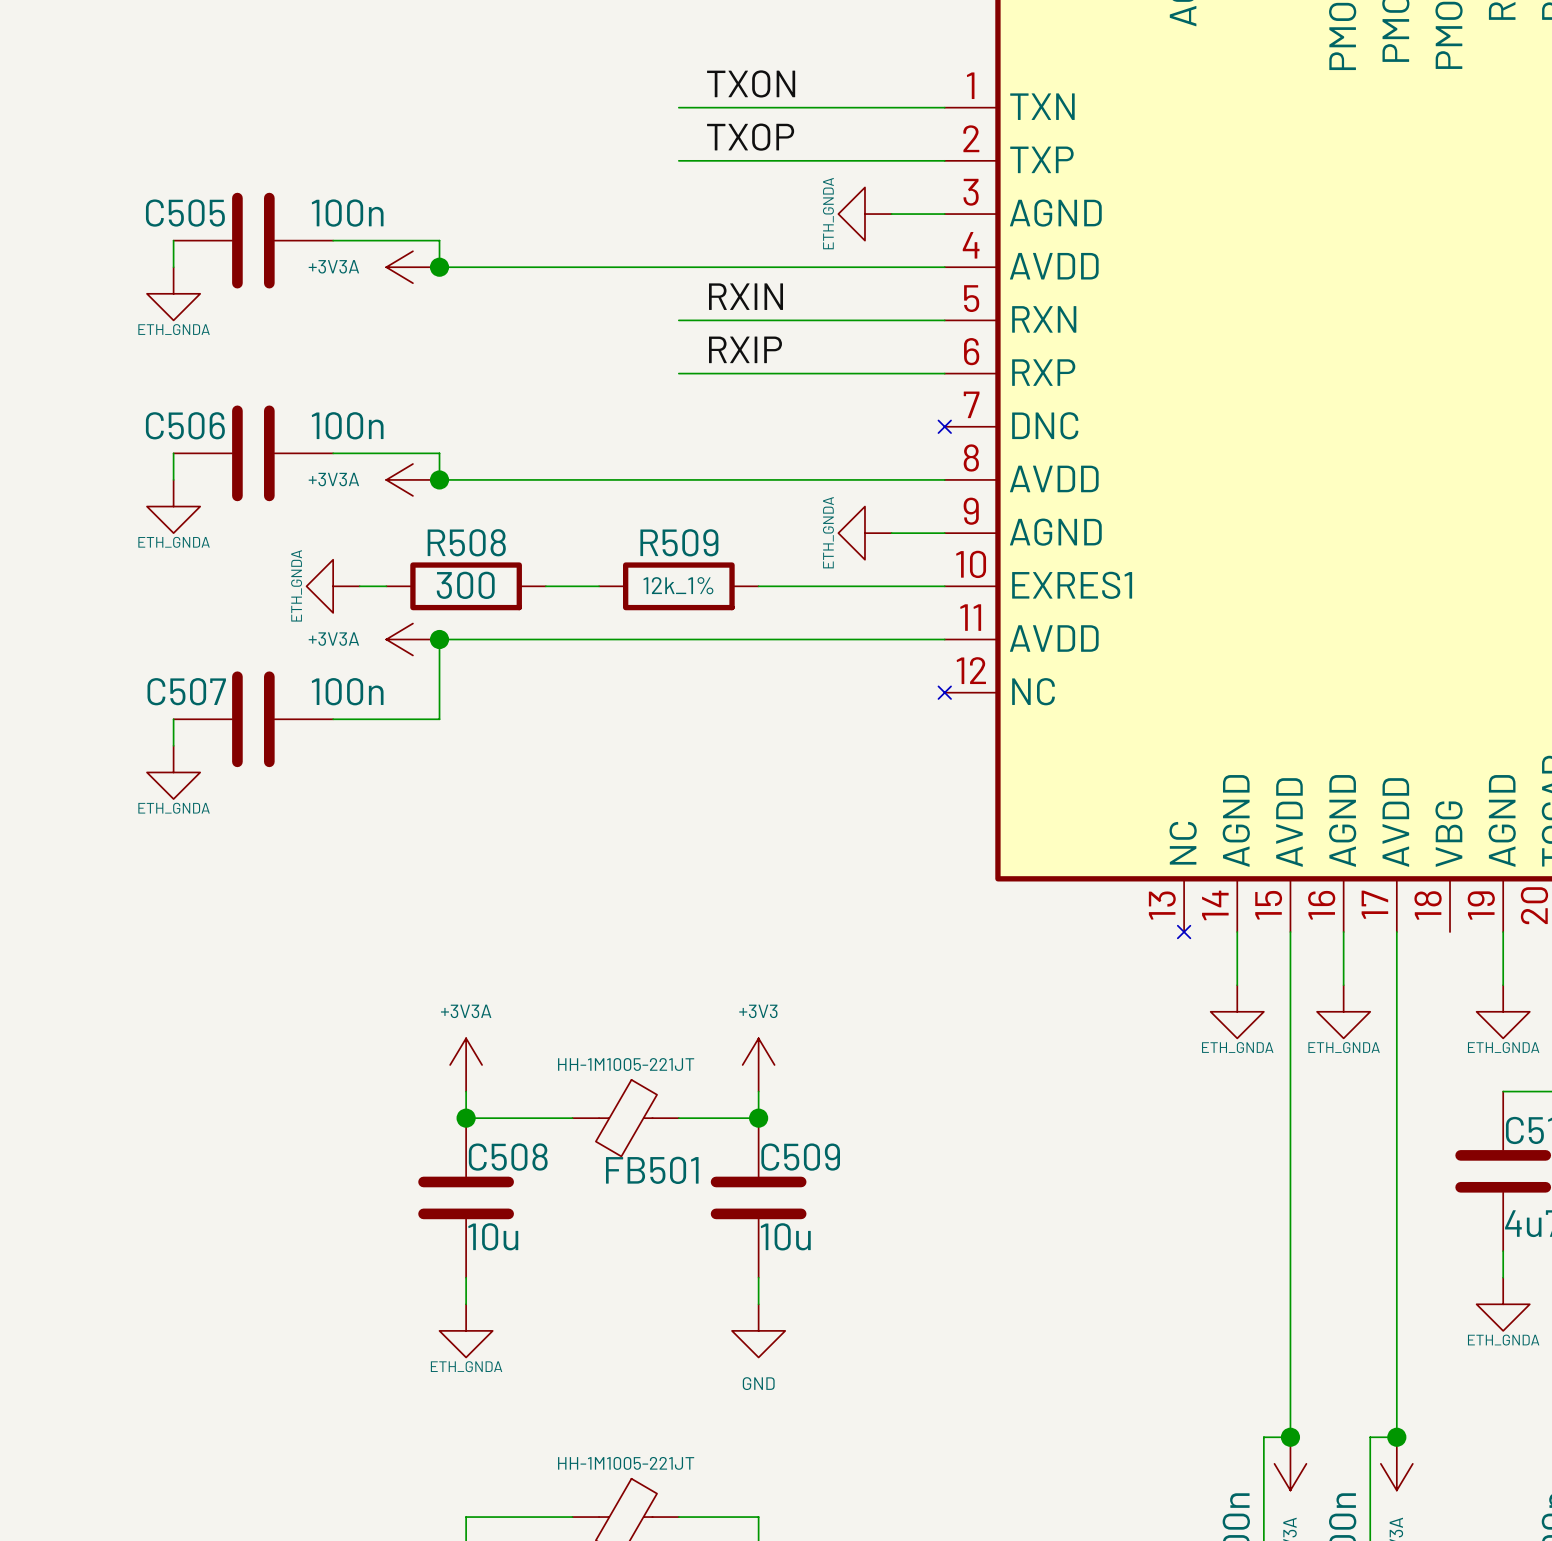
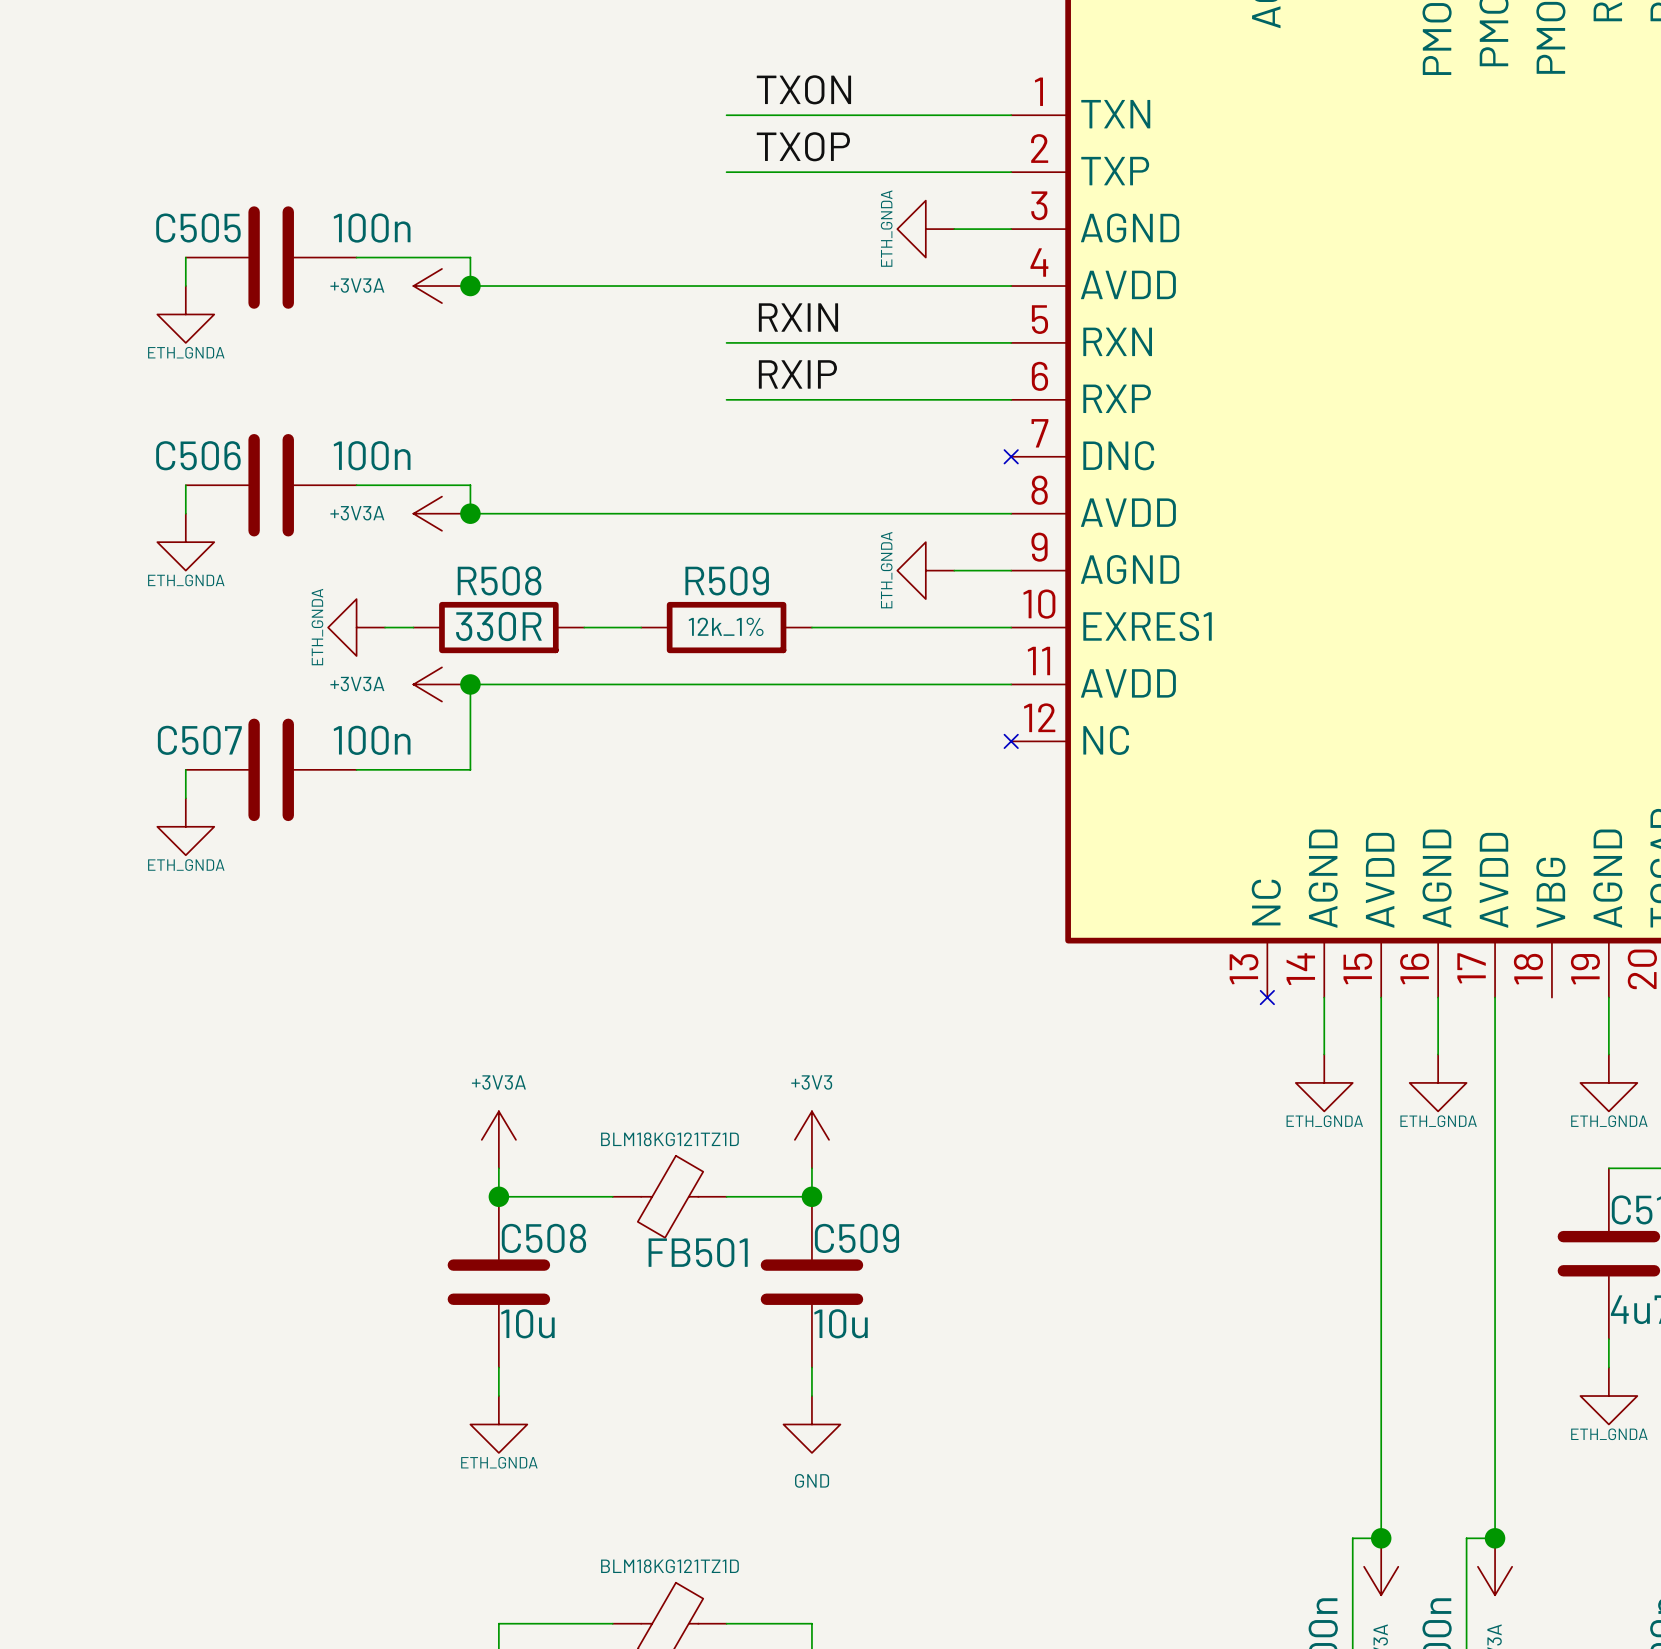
R508 value: 300 (465, 585) -> 330R (498, 626)
FB501 value: HH-1M1005-221JT (626, 1064) -> BLM18KG121TZ1D (669, 1139)
part value: HH-1M1005-221JT (626, 1463) -> BLM18KG121TZ1D (669, 1566)

